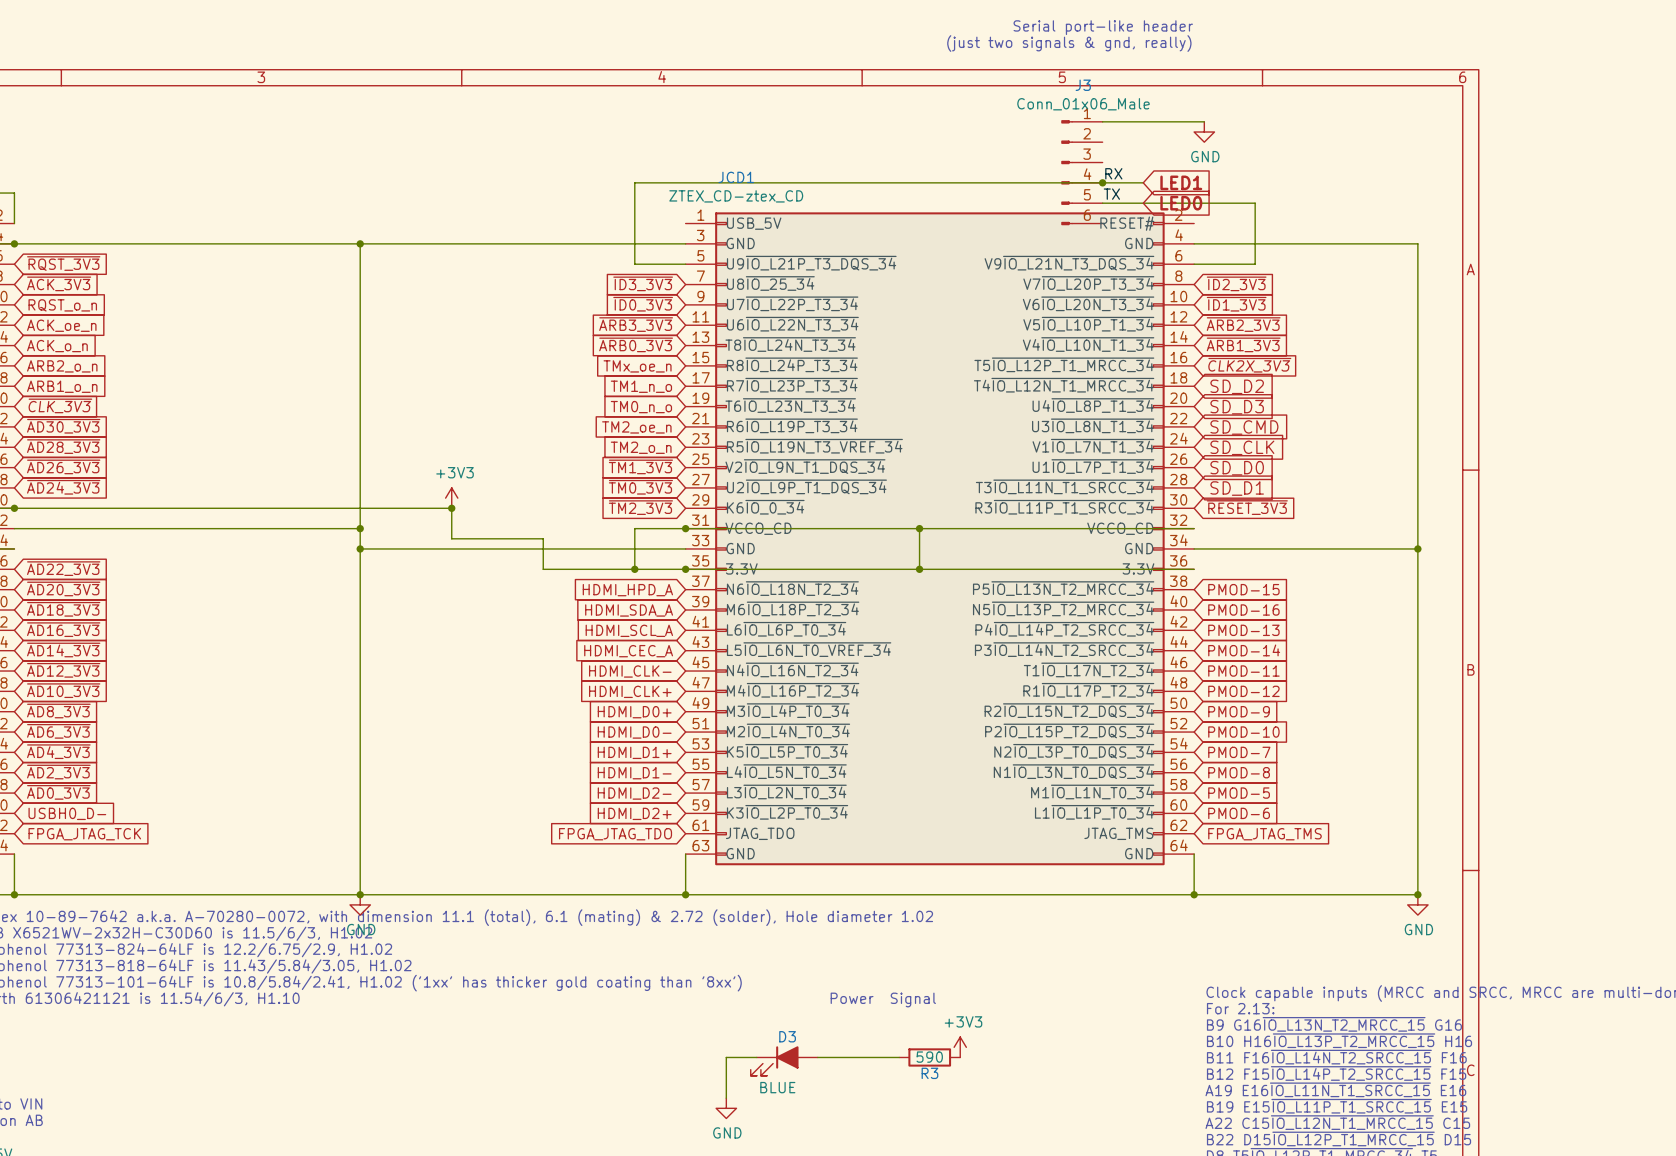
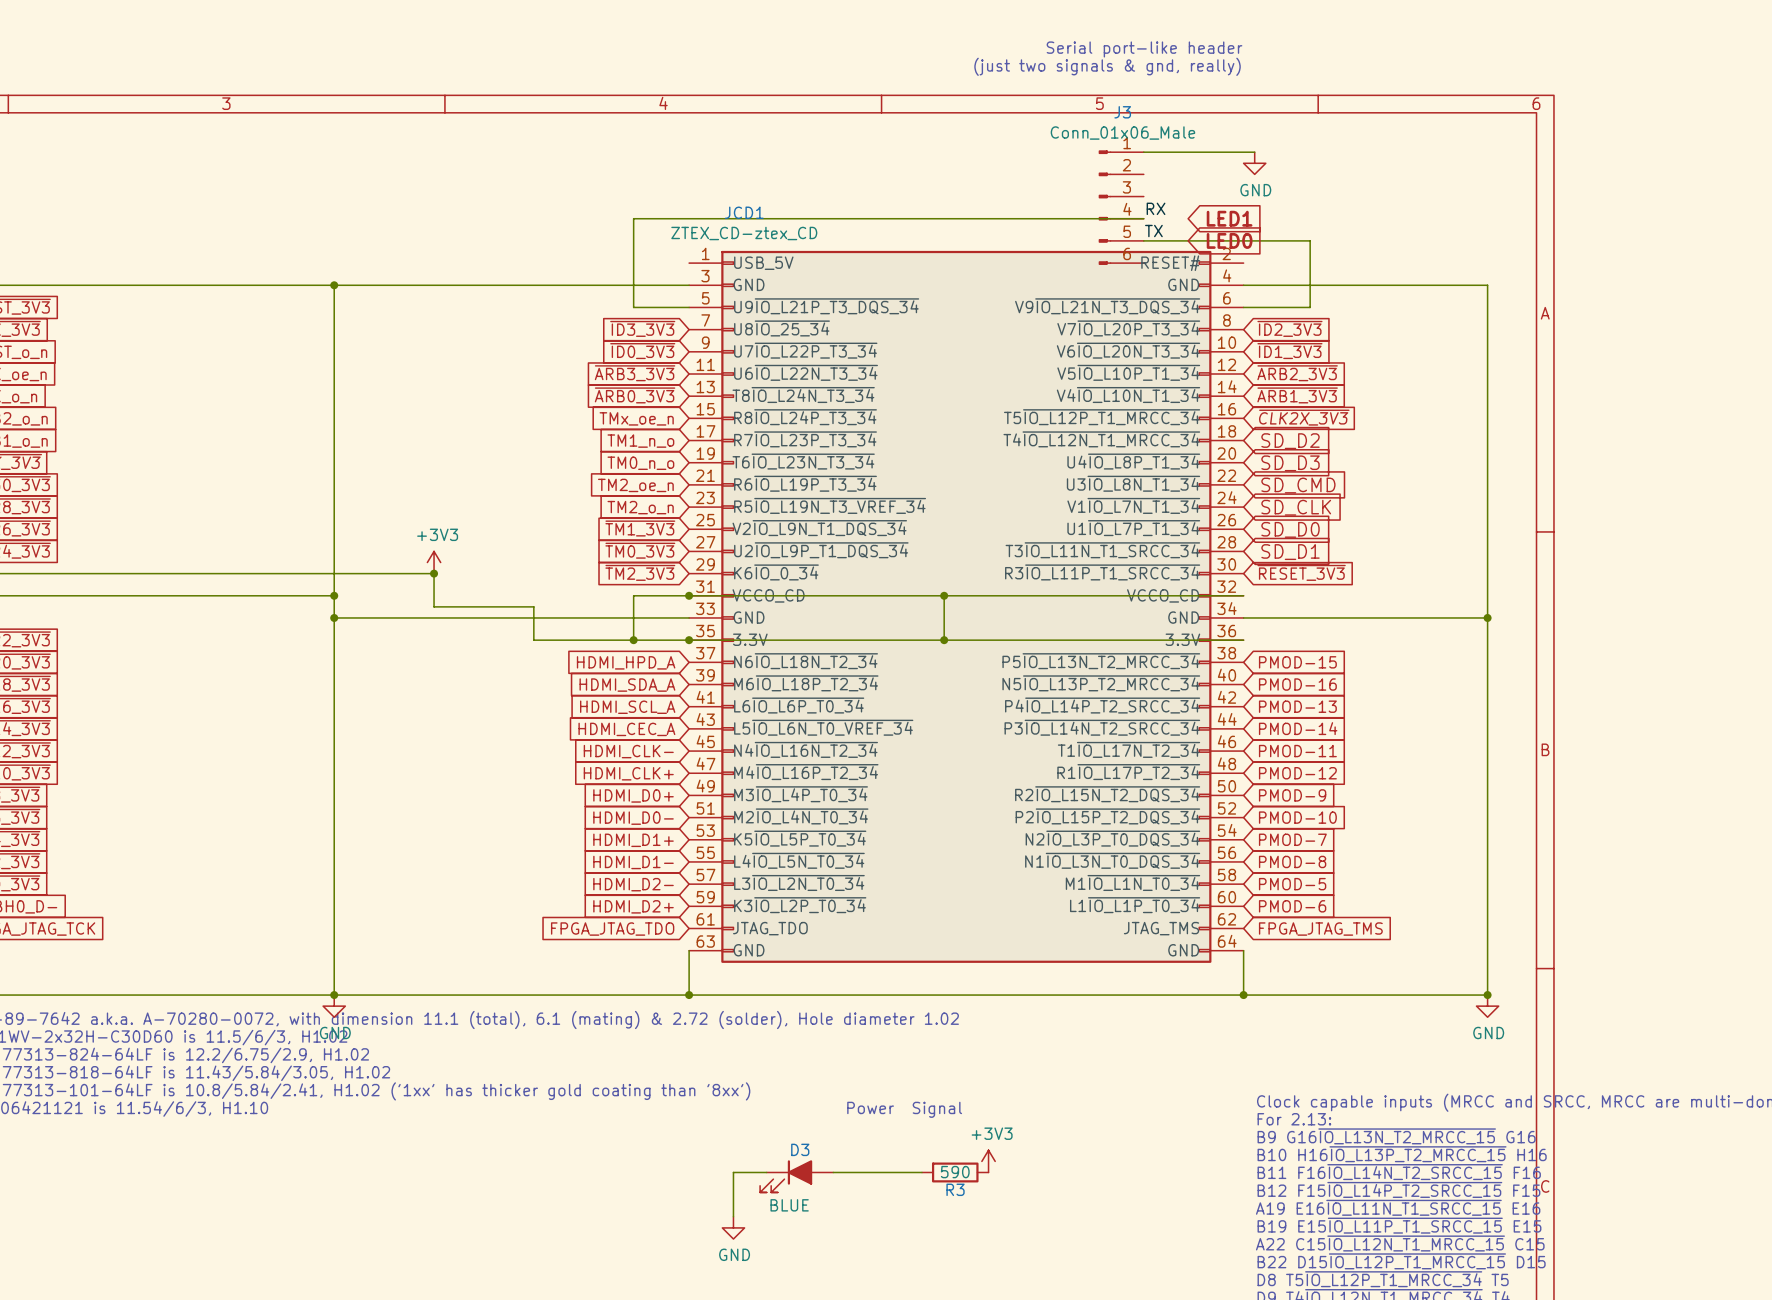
wire: (1102, 182) (1143, 182) -> none
junction: (1102, 182) -> none

